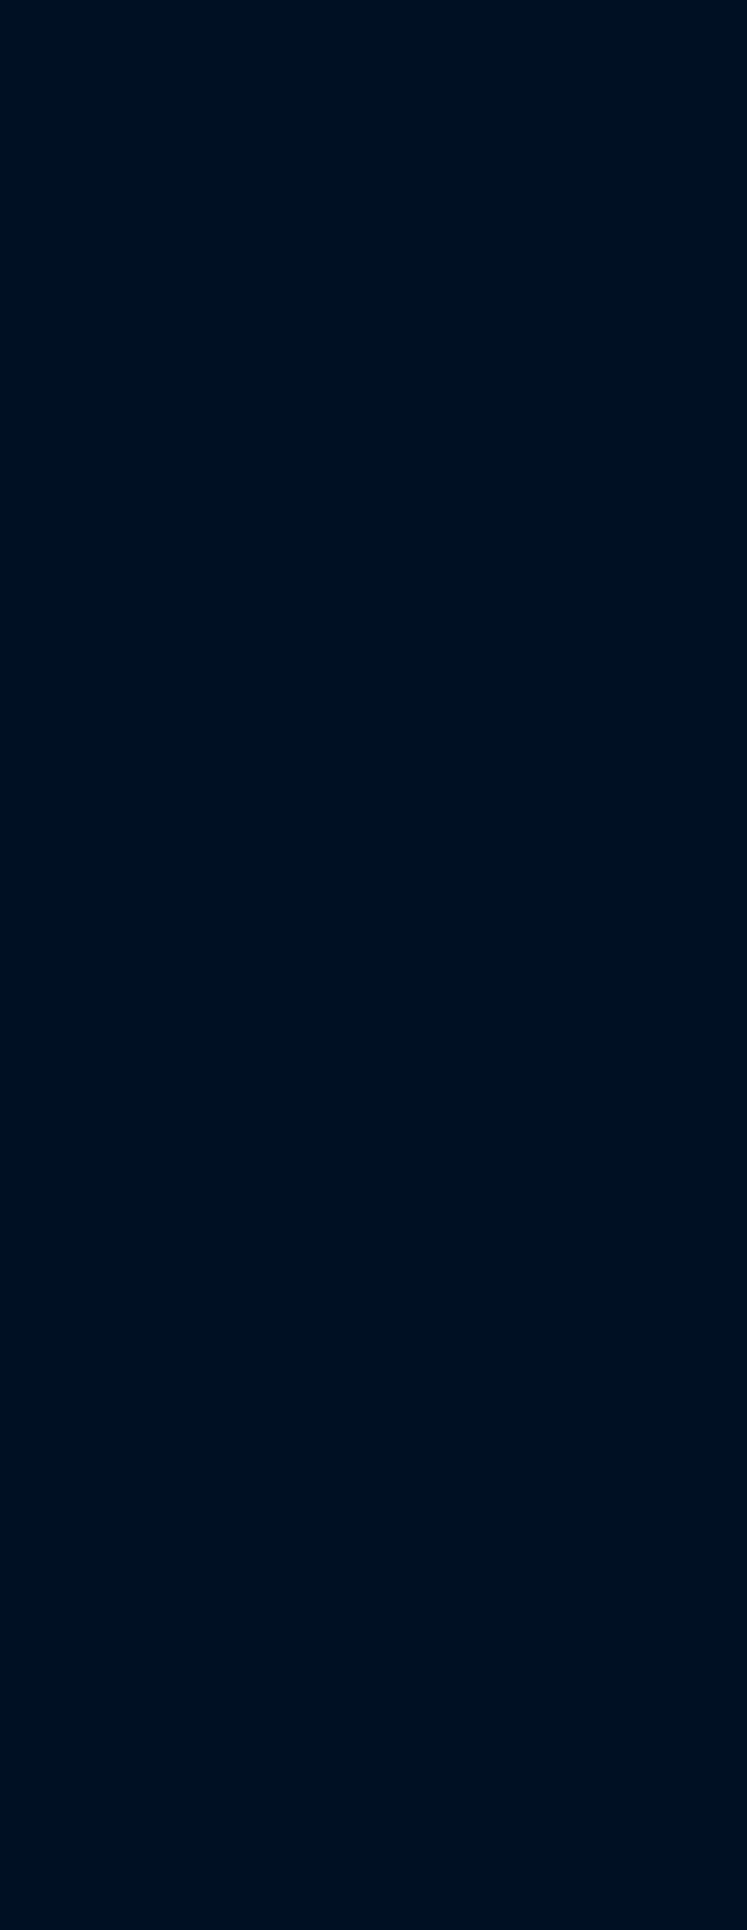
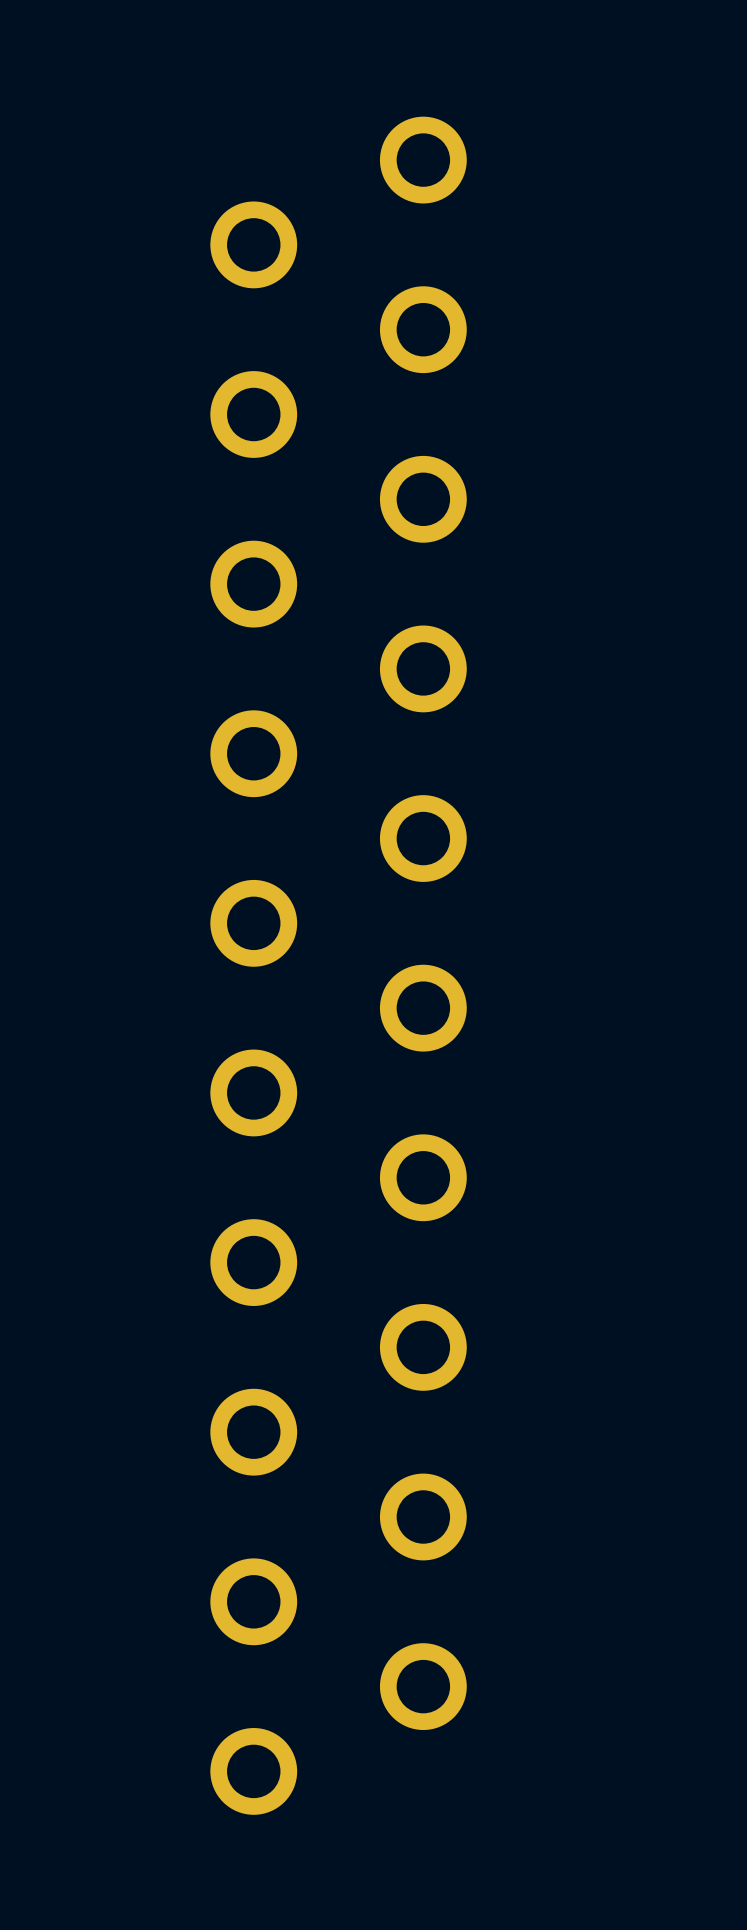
part: none -> (338, 965)

